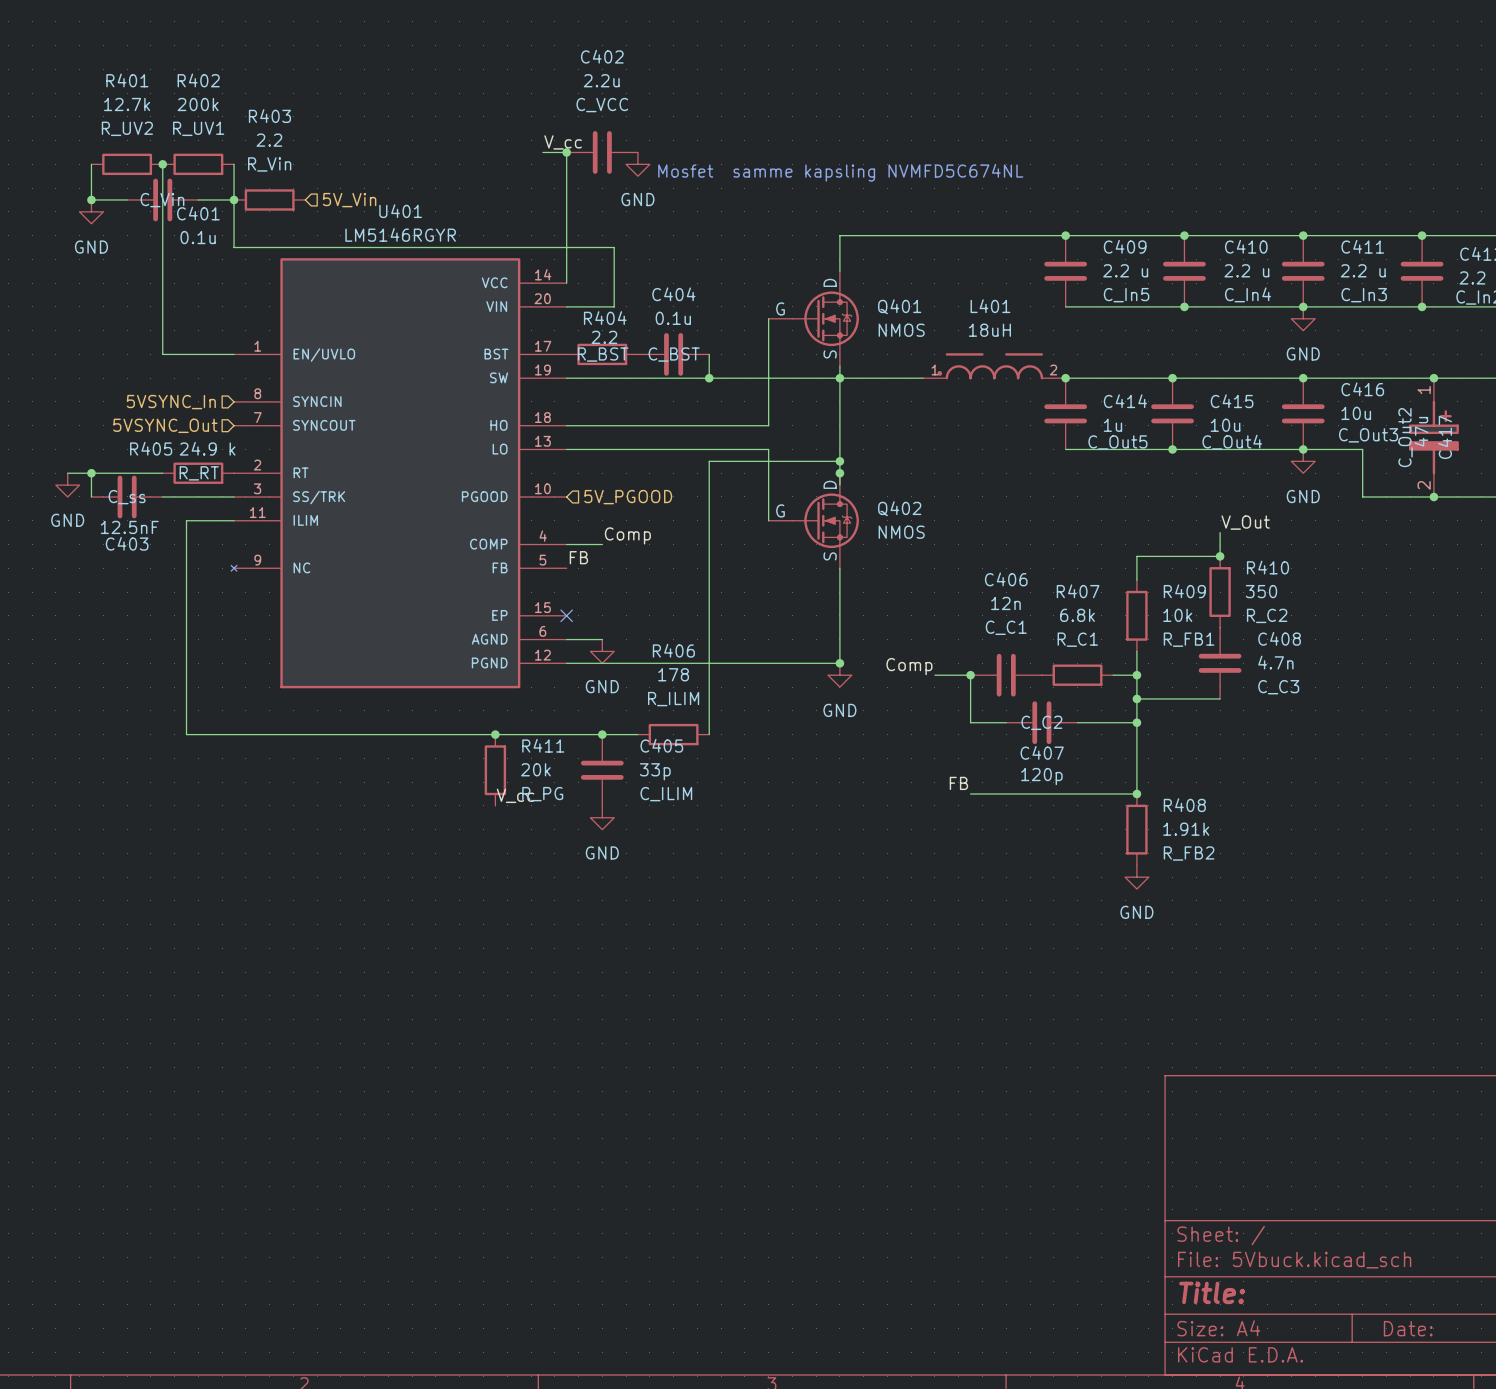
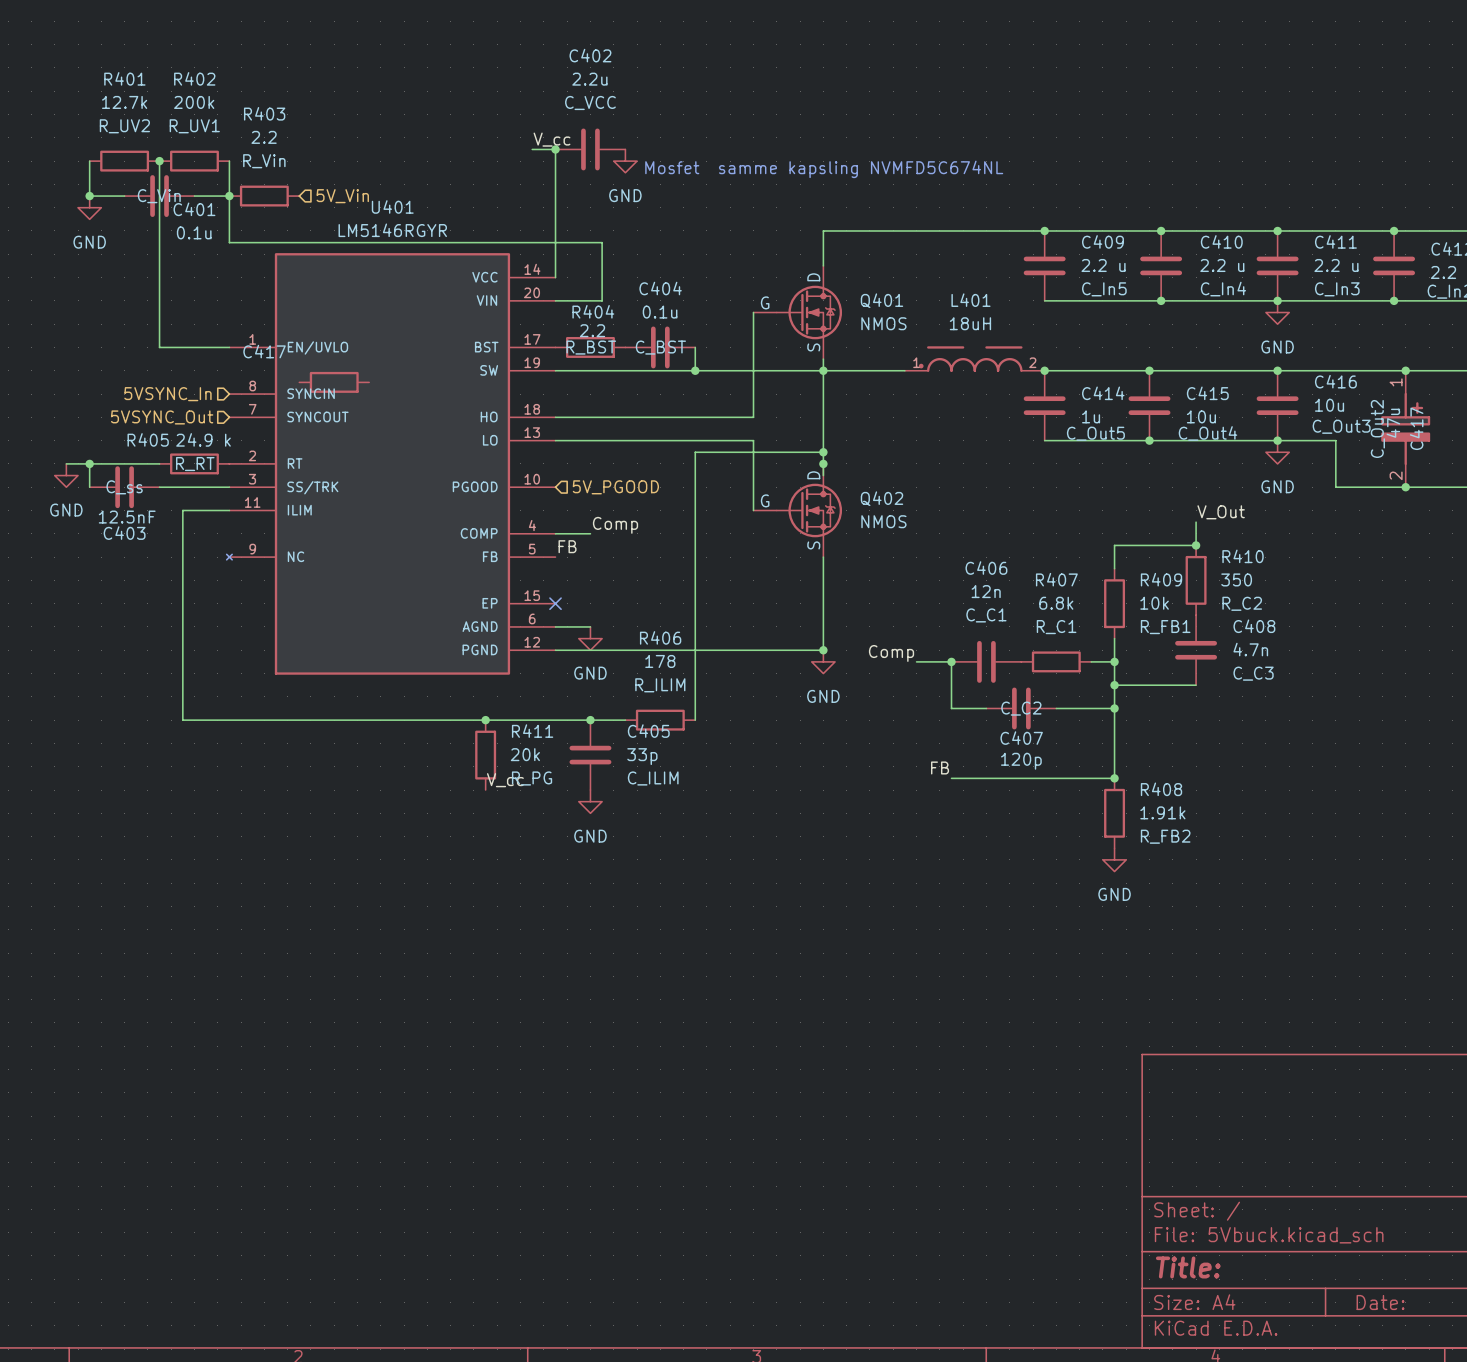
C417: none -> (334, 382)

